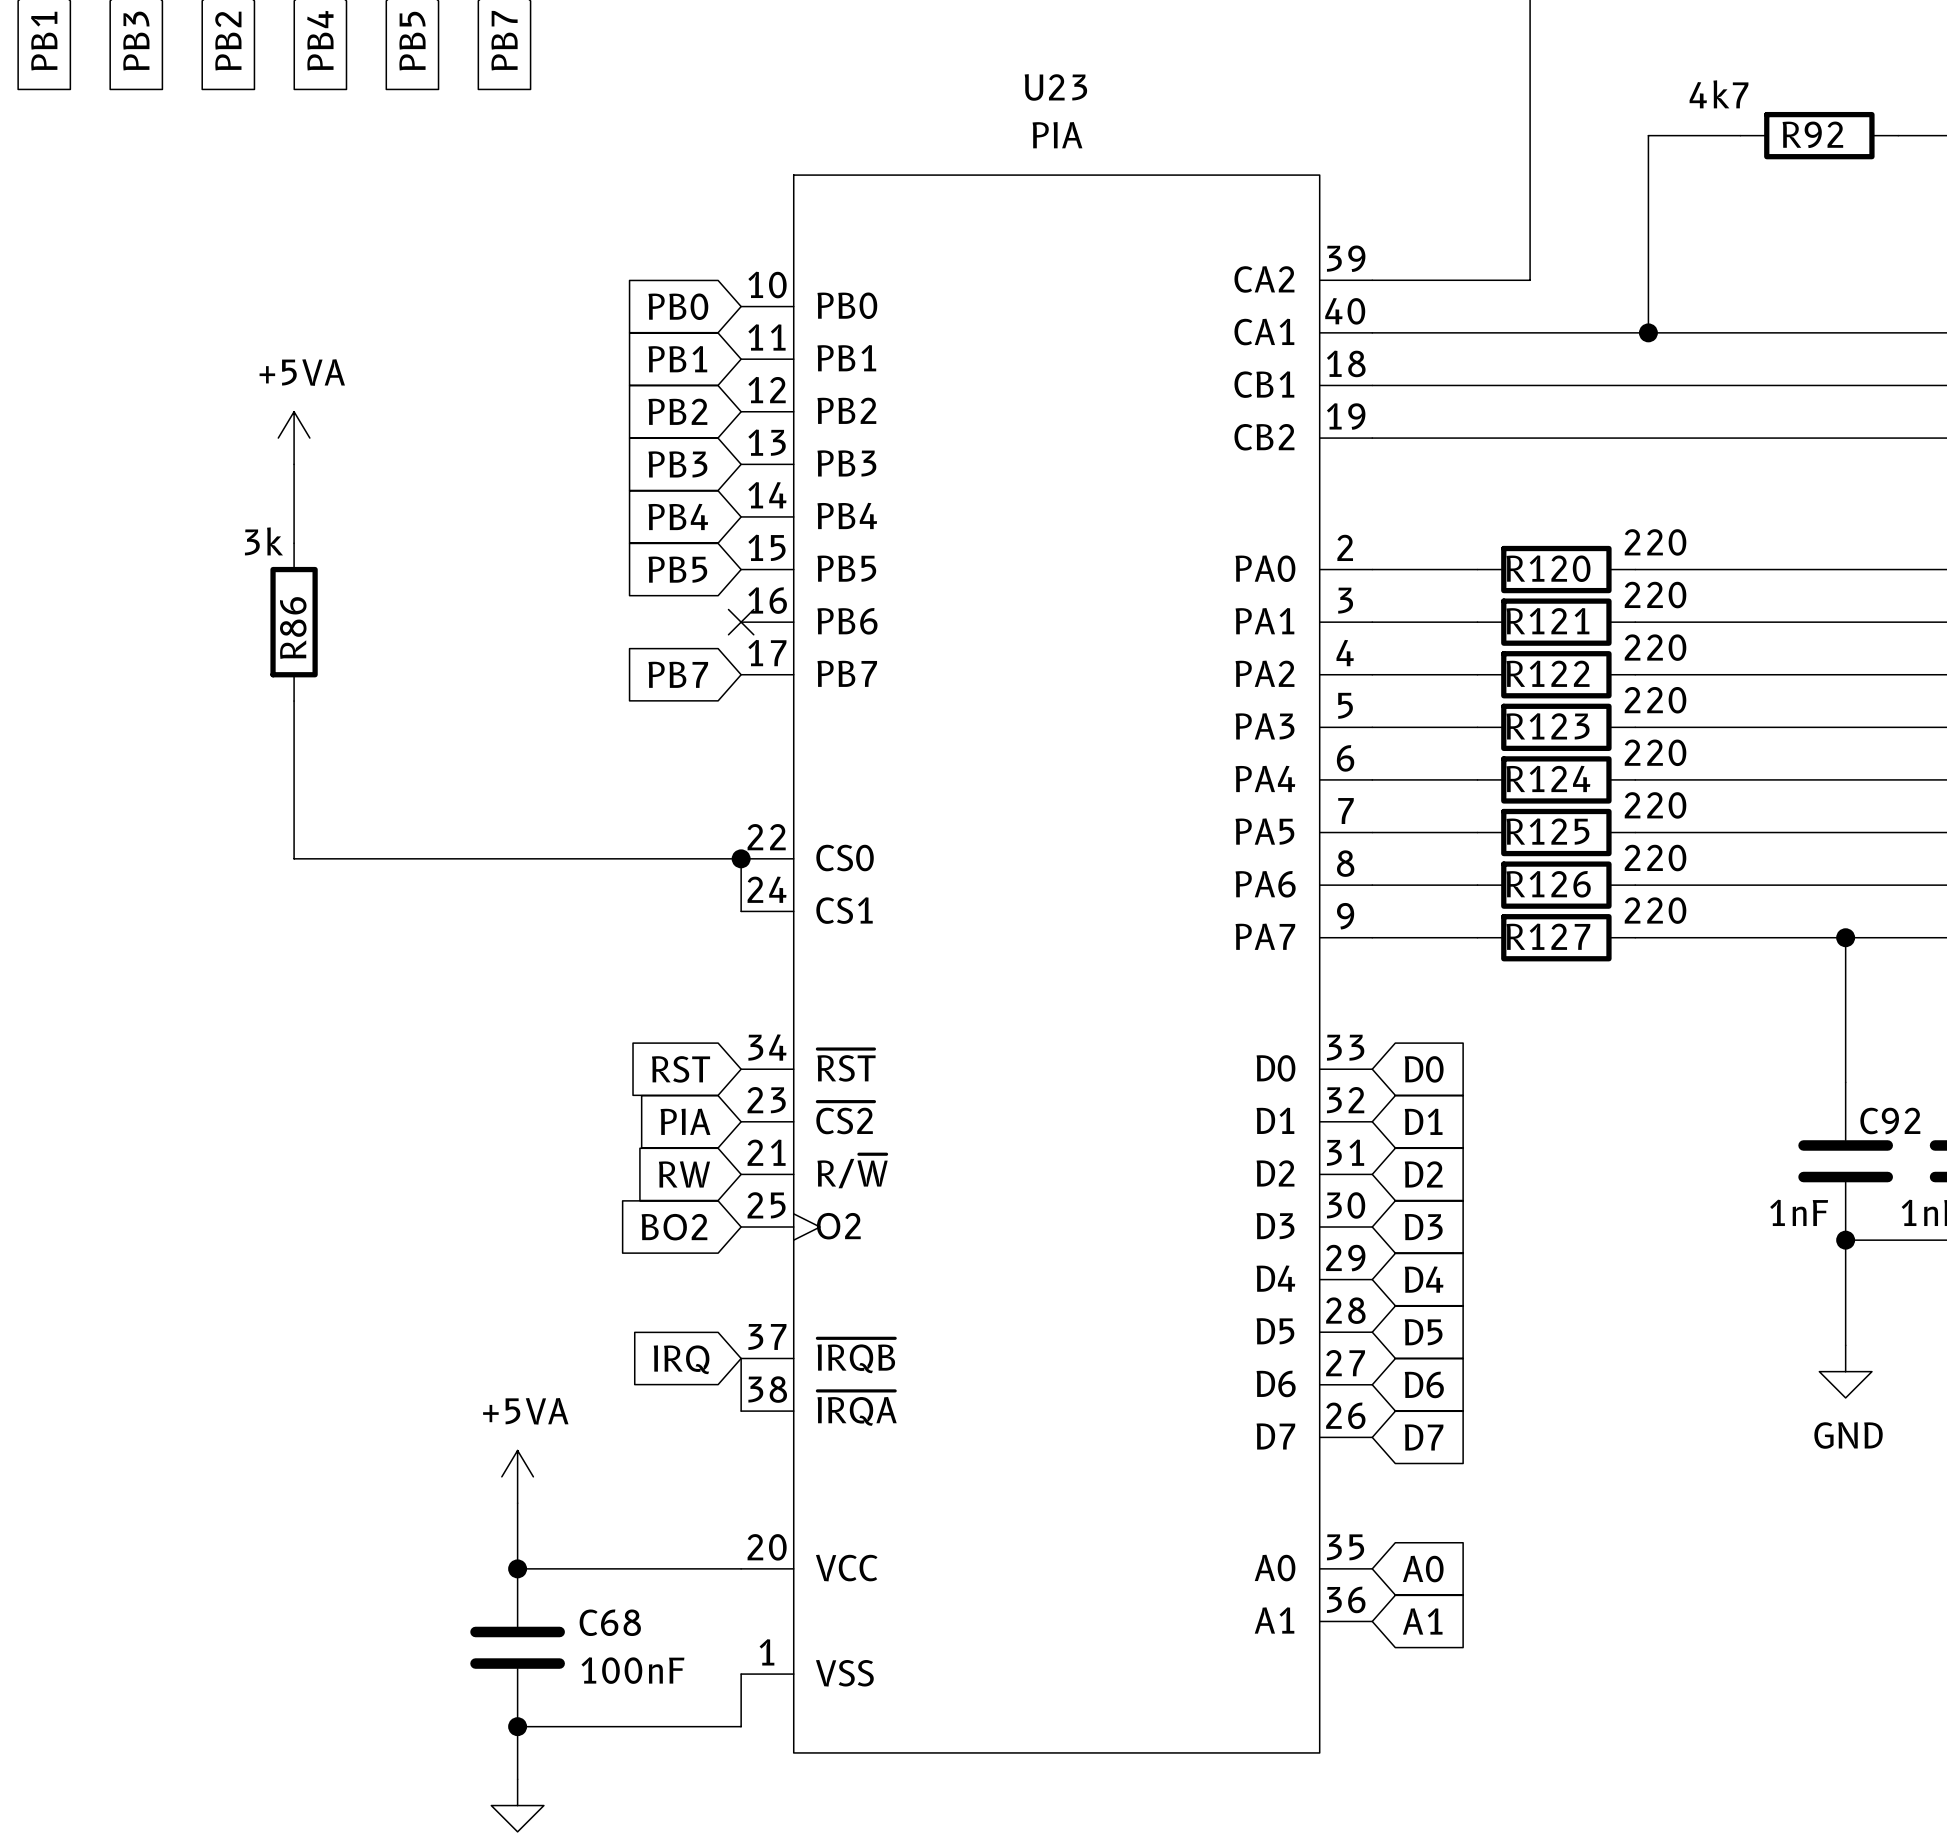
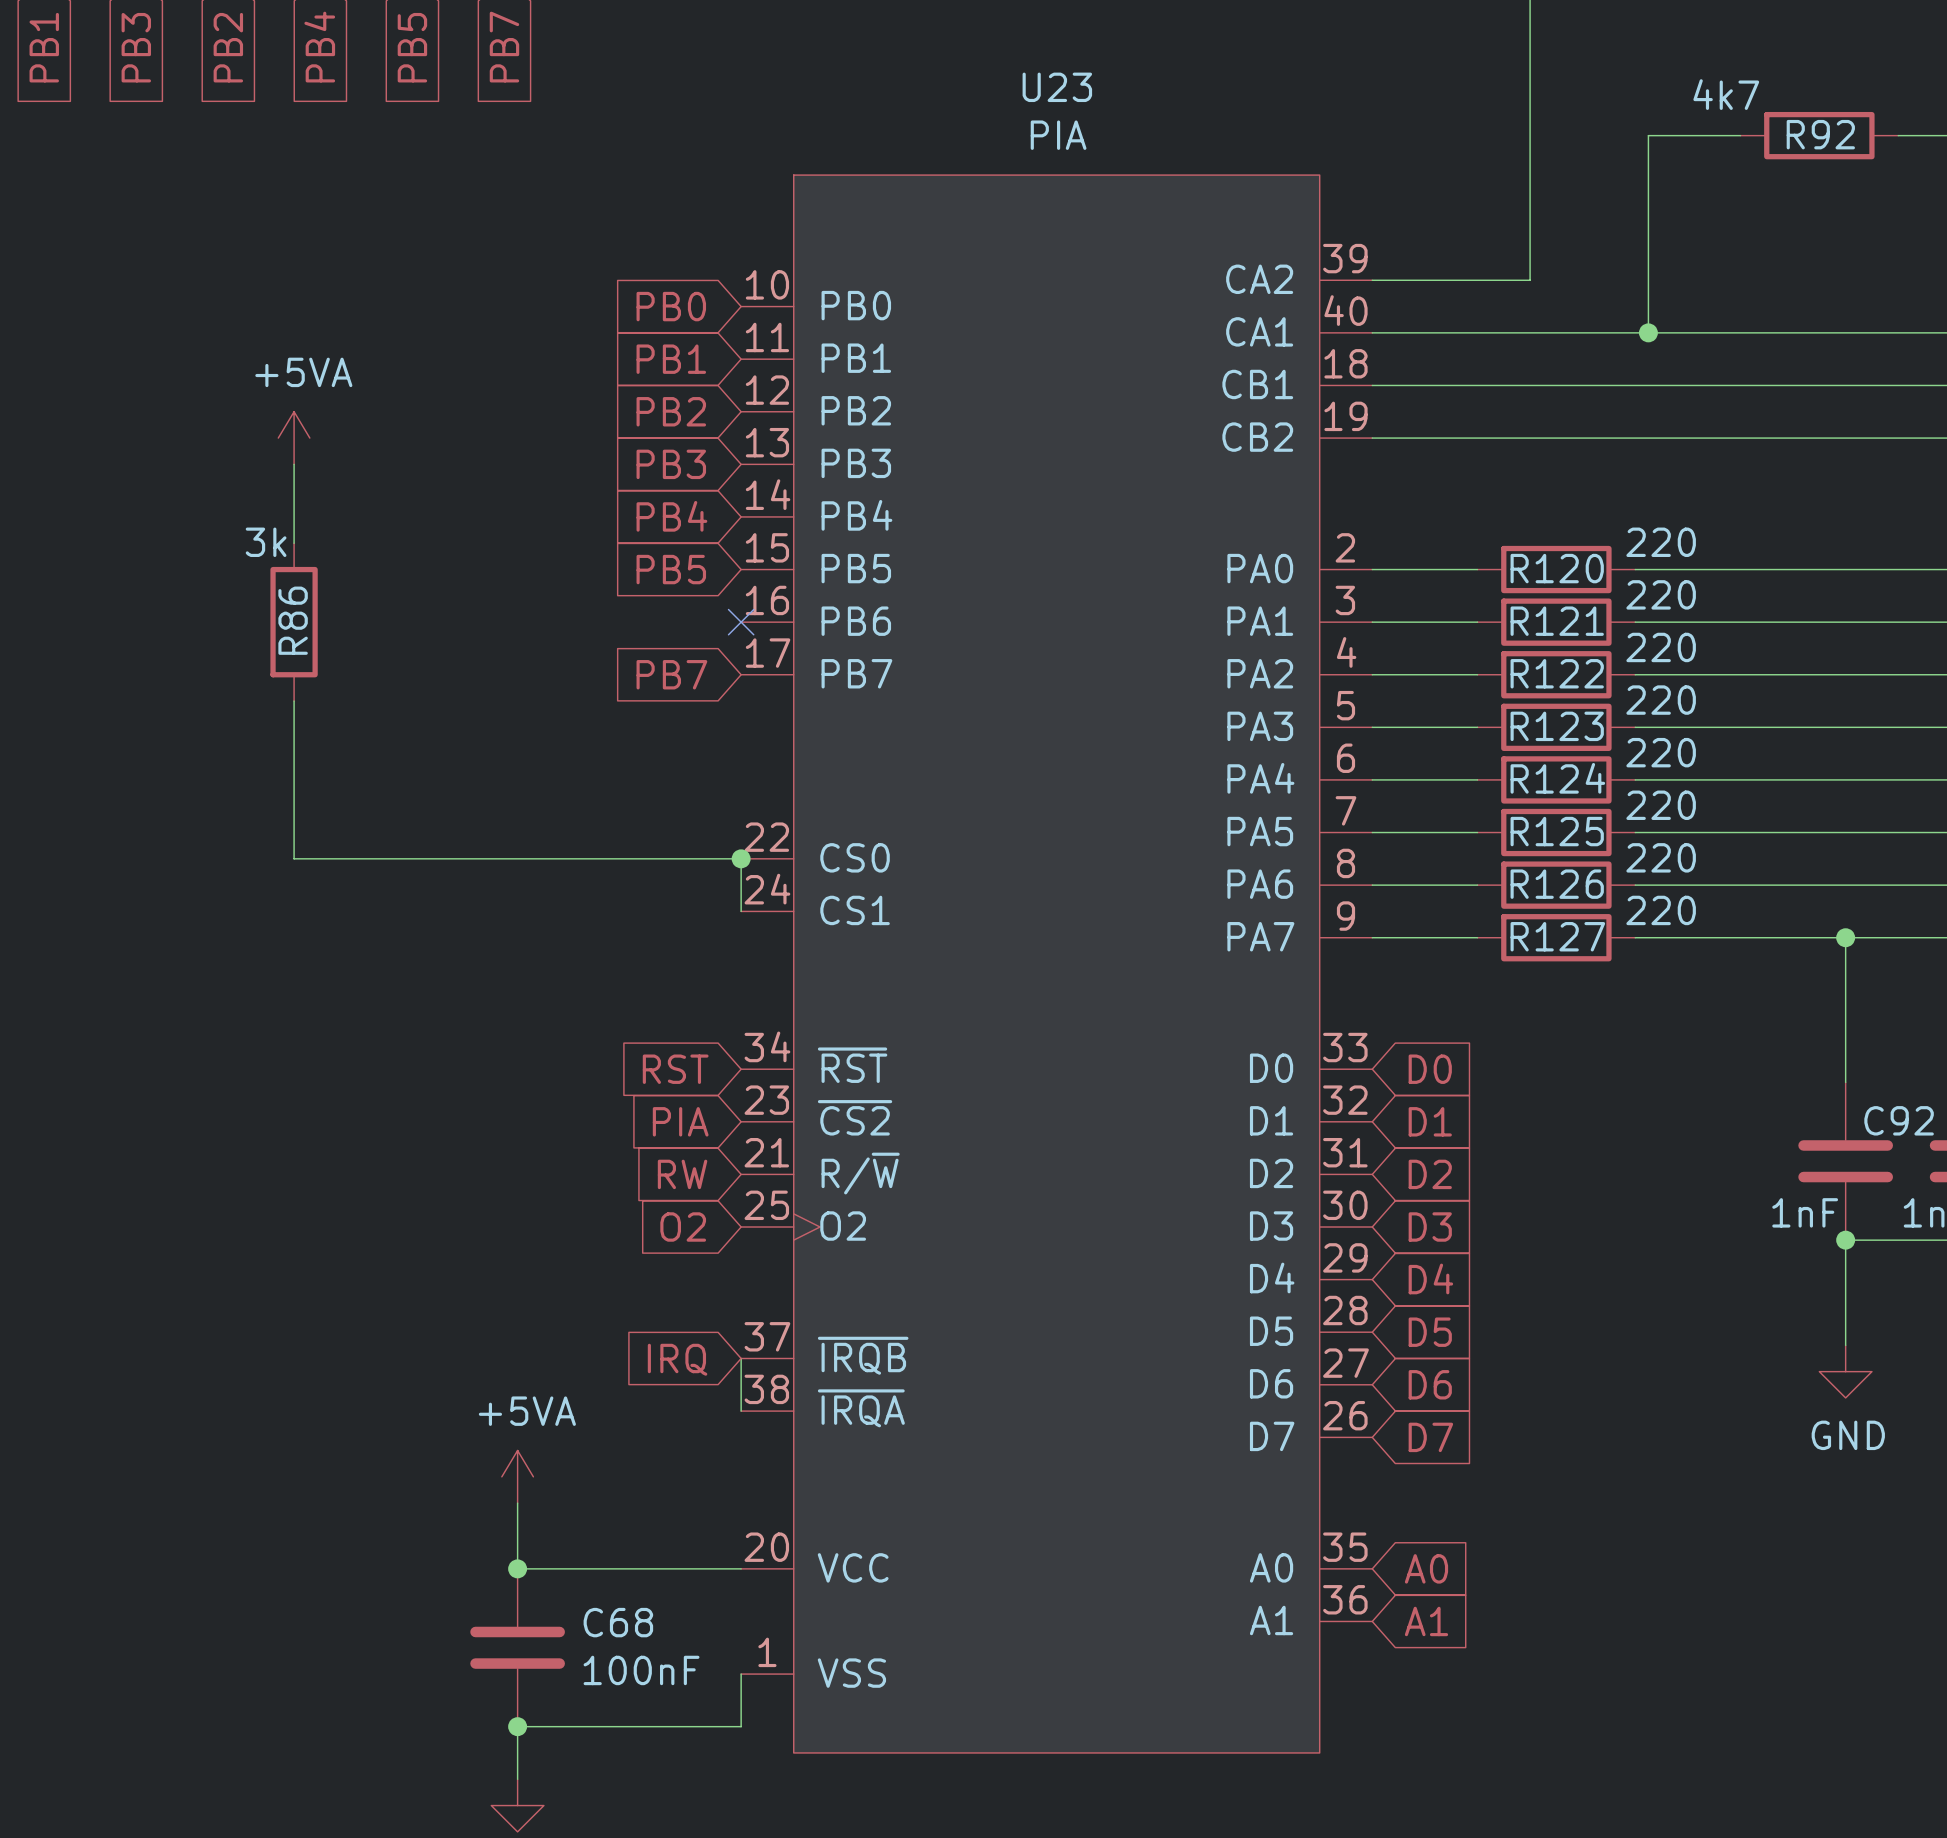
global label: BO2 (674, 1227) -> O2 (683, 1227)

